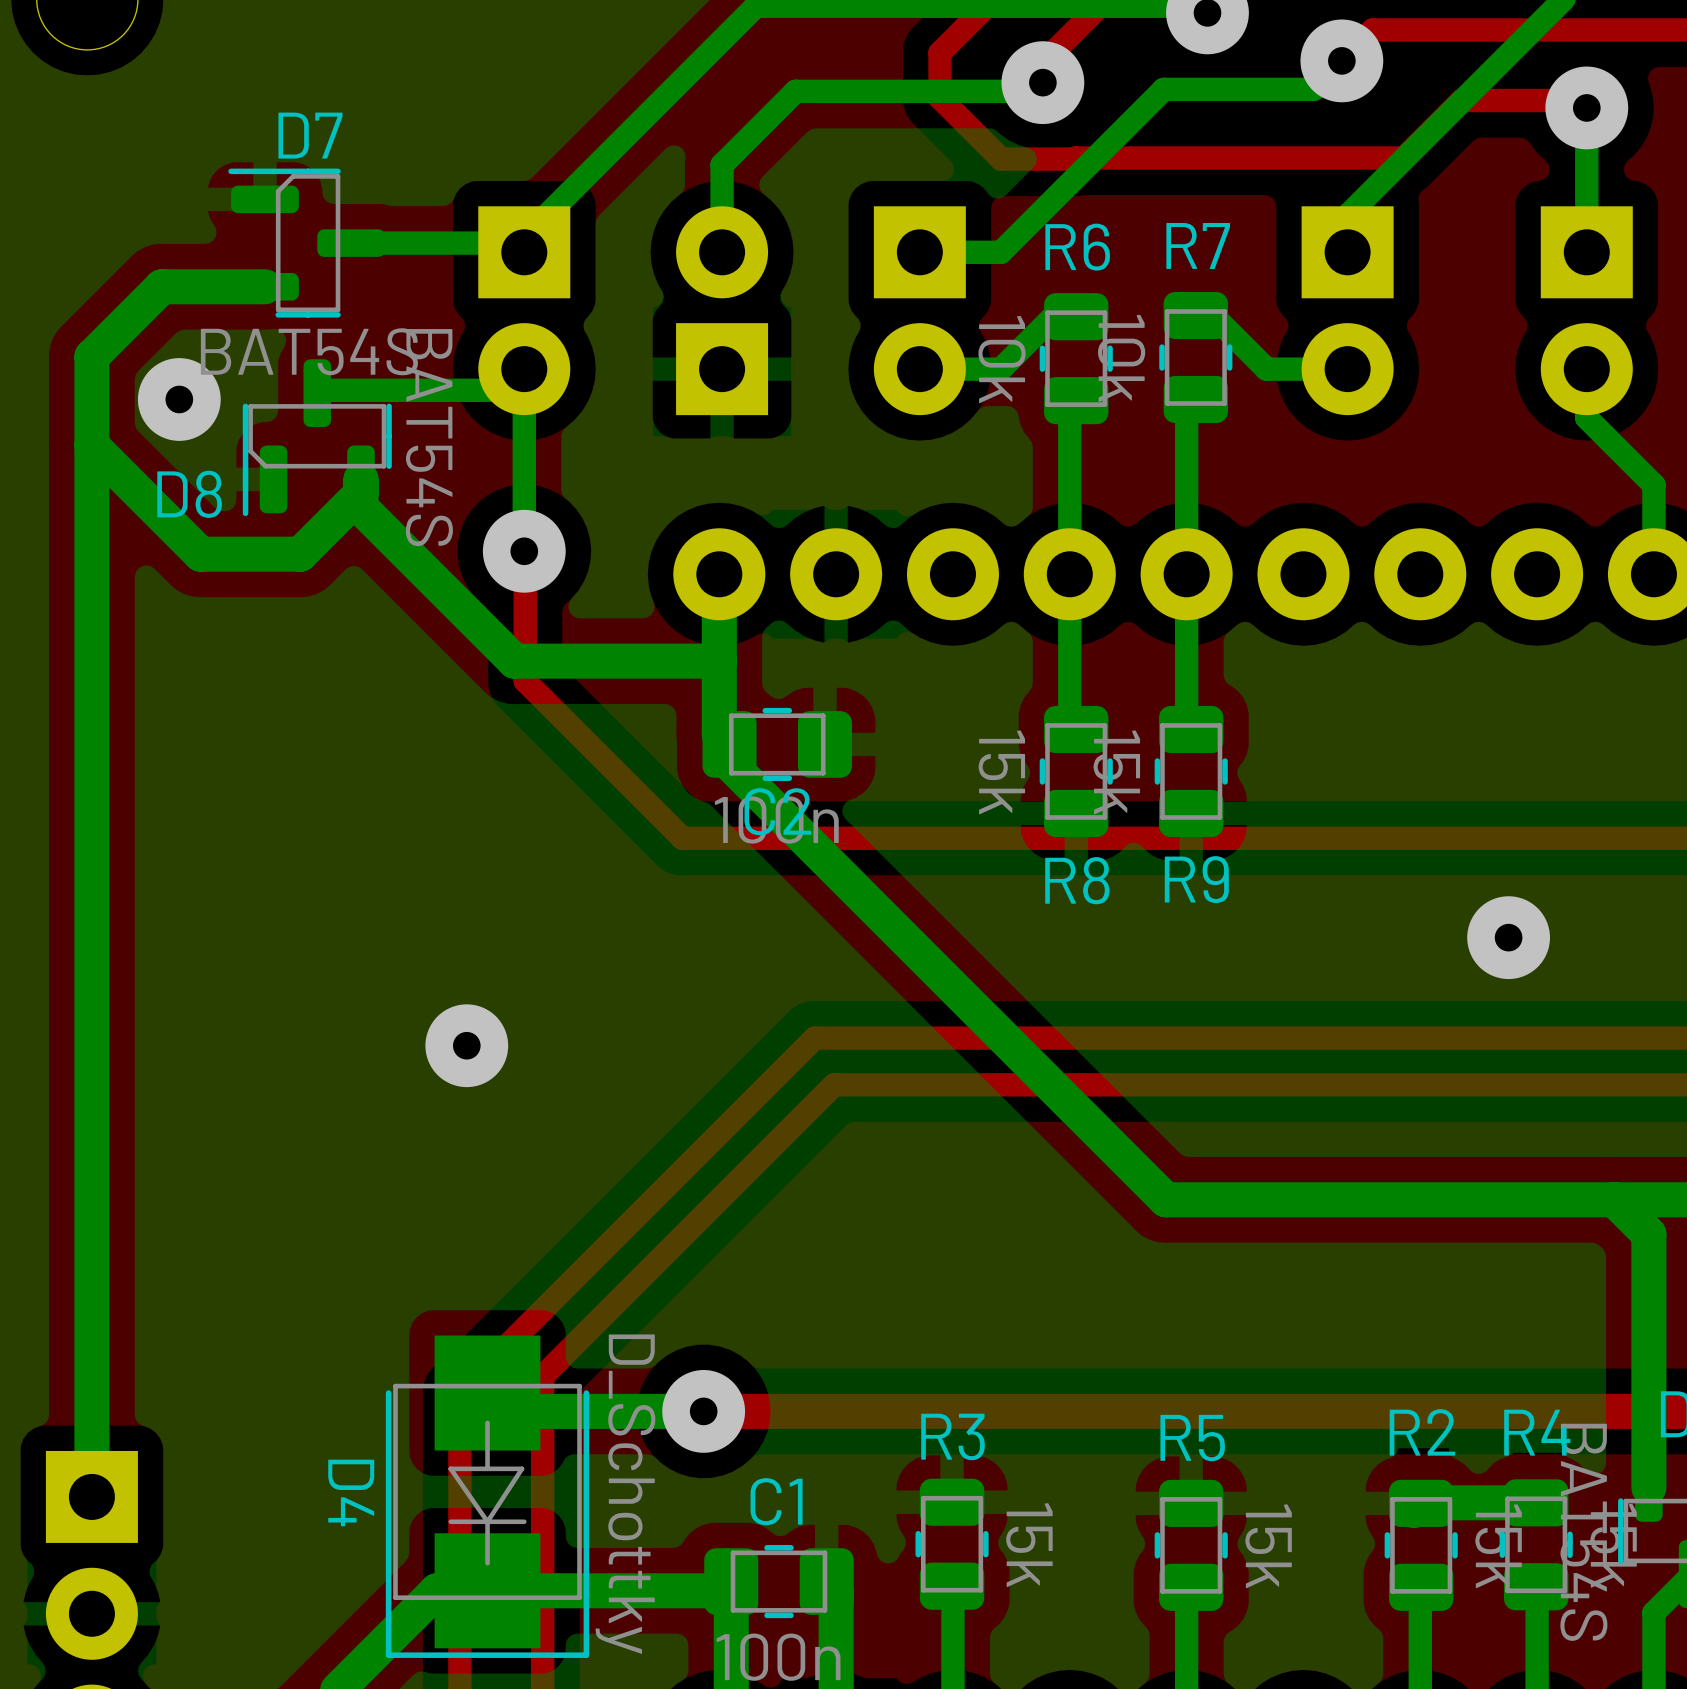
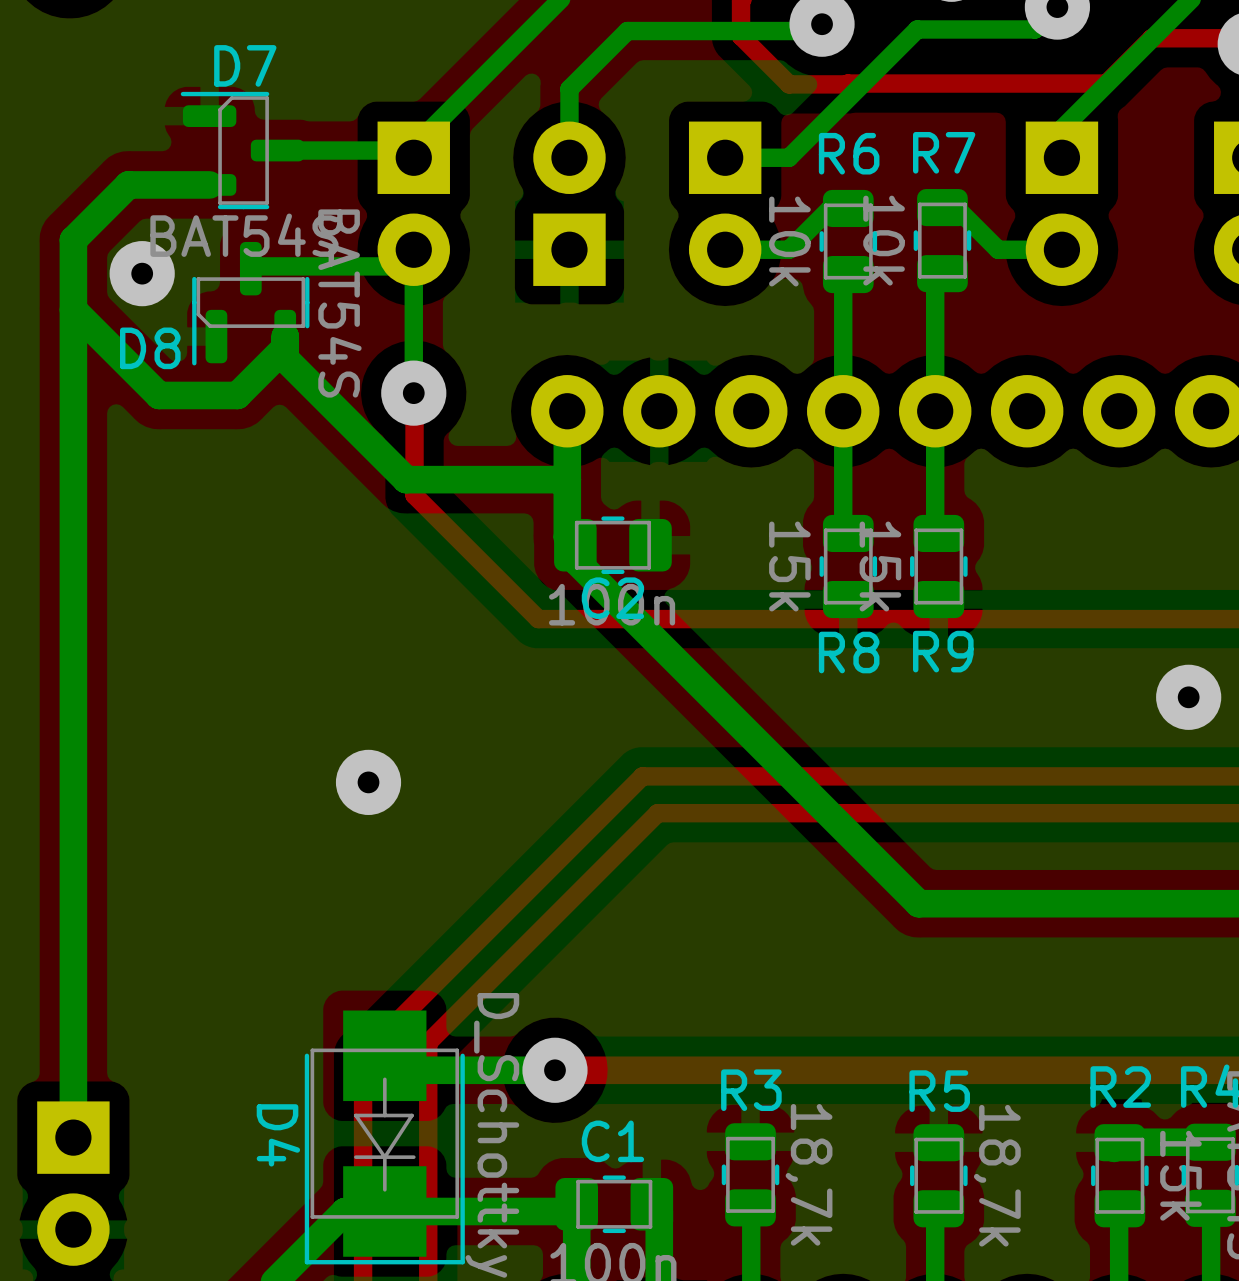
R3 value: 15k (1029, 1545) -> 18,7k (809, 1174)
R5 value: 15k (1268, 1546) -> 18,7k (997, 1175)

